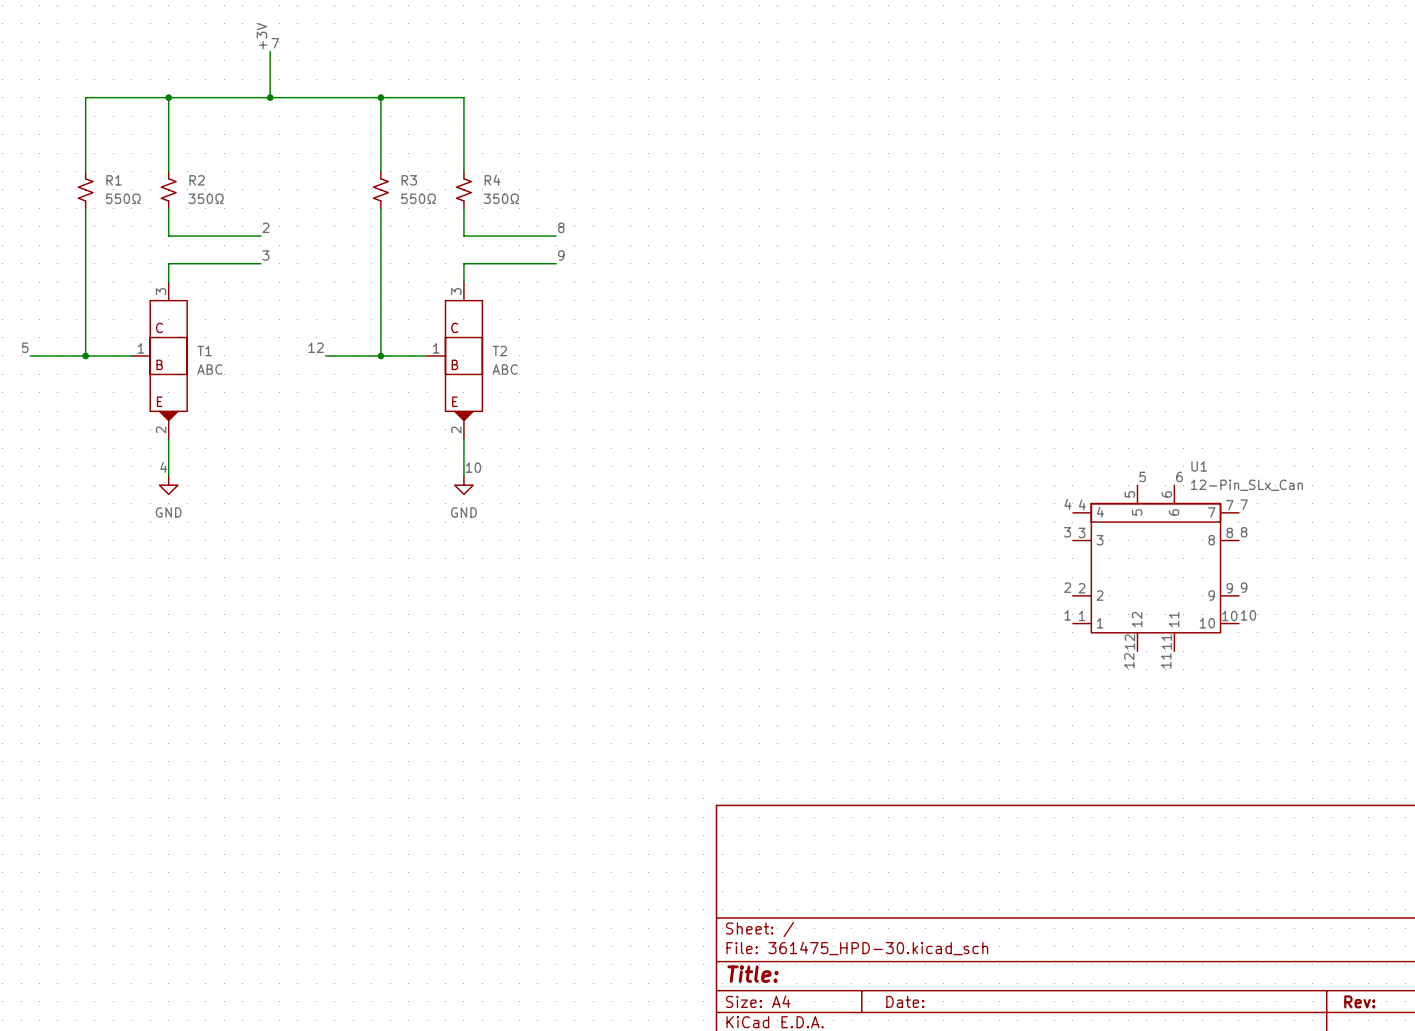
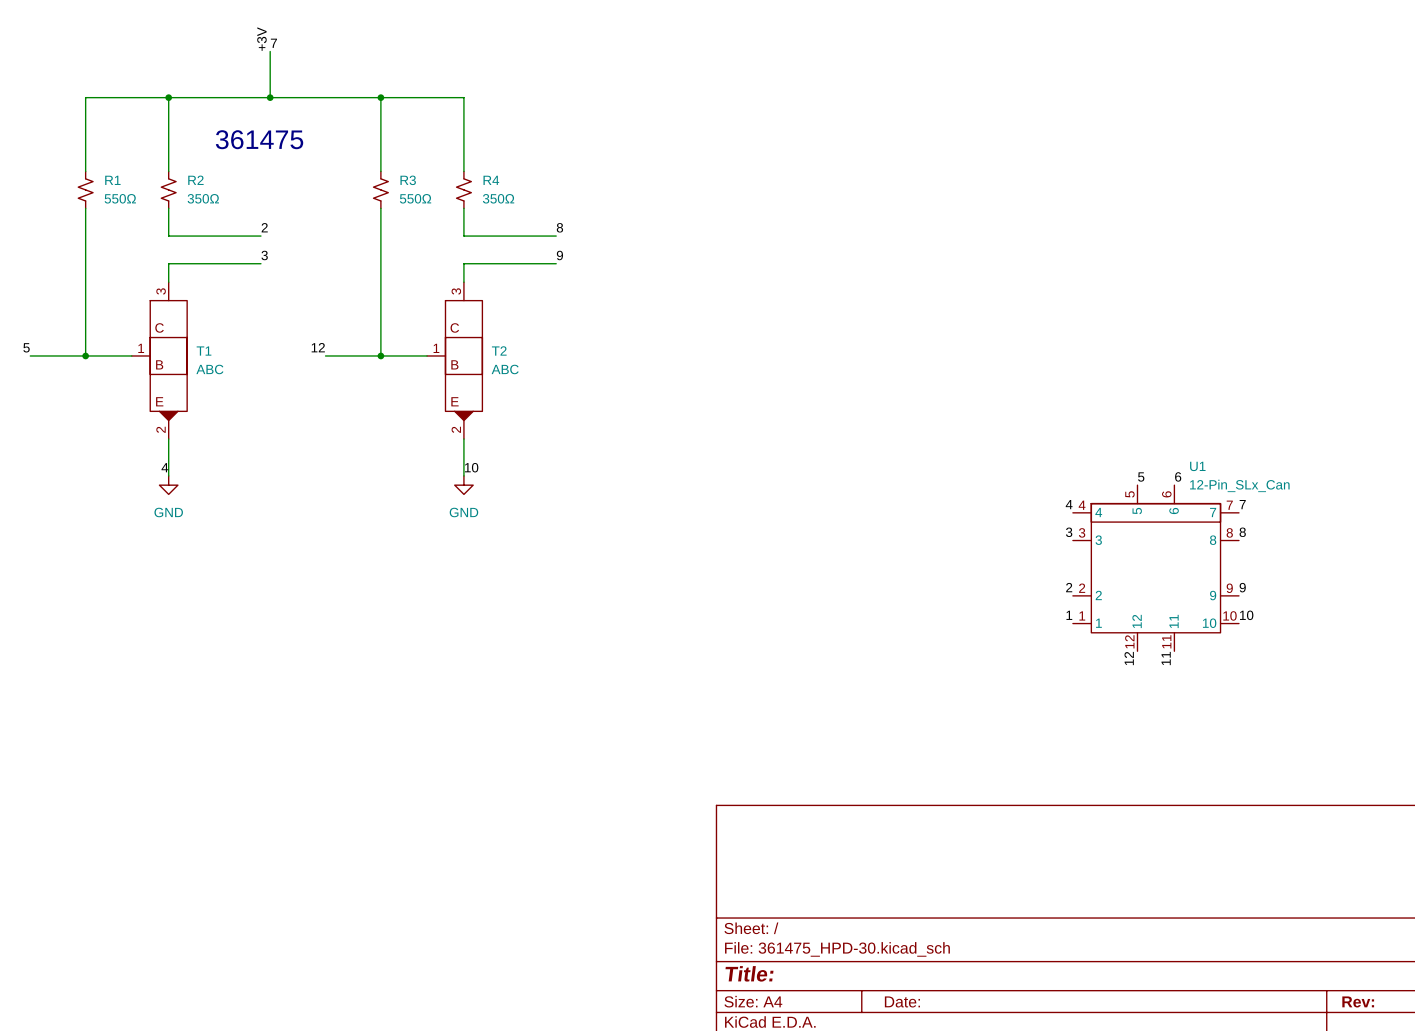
text: none -> 361475 (259, 139)

